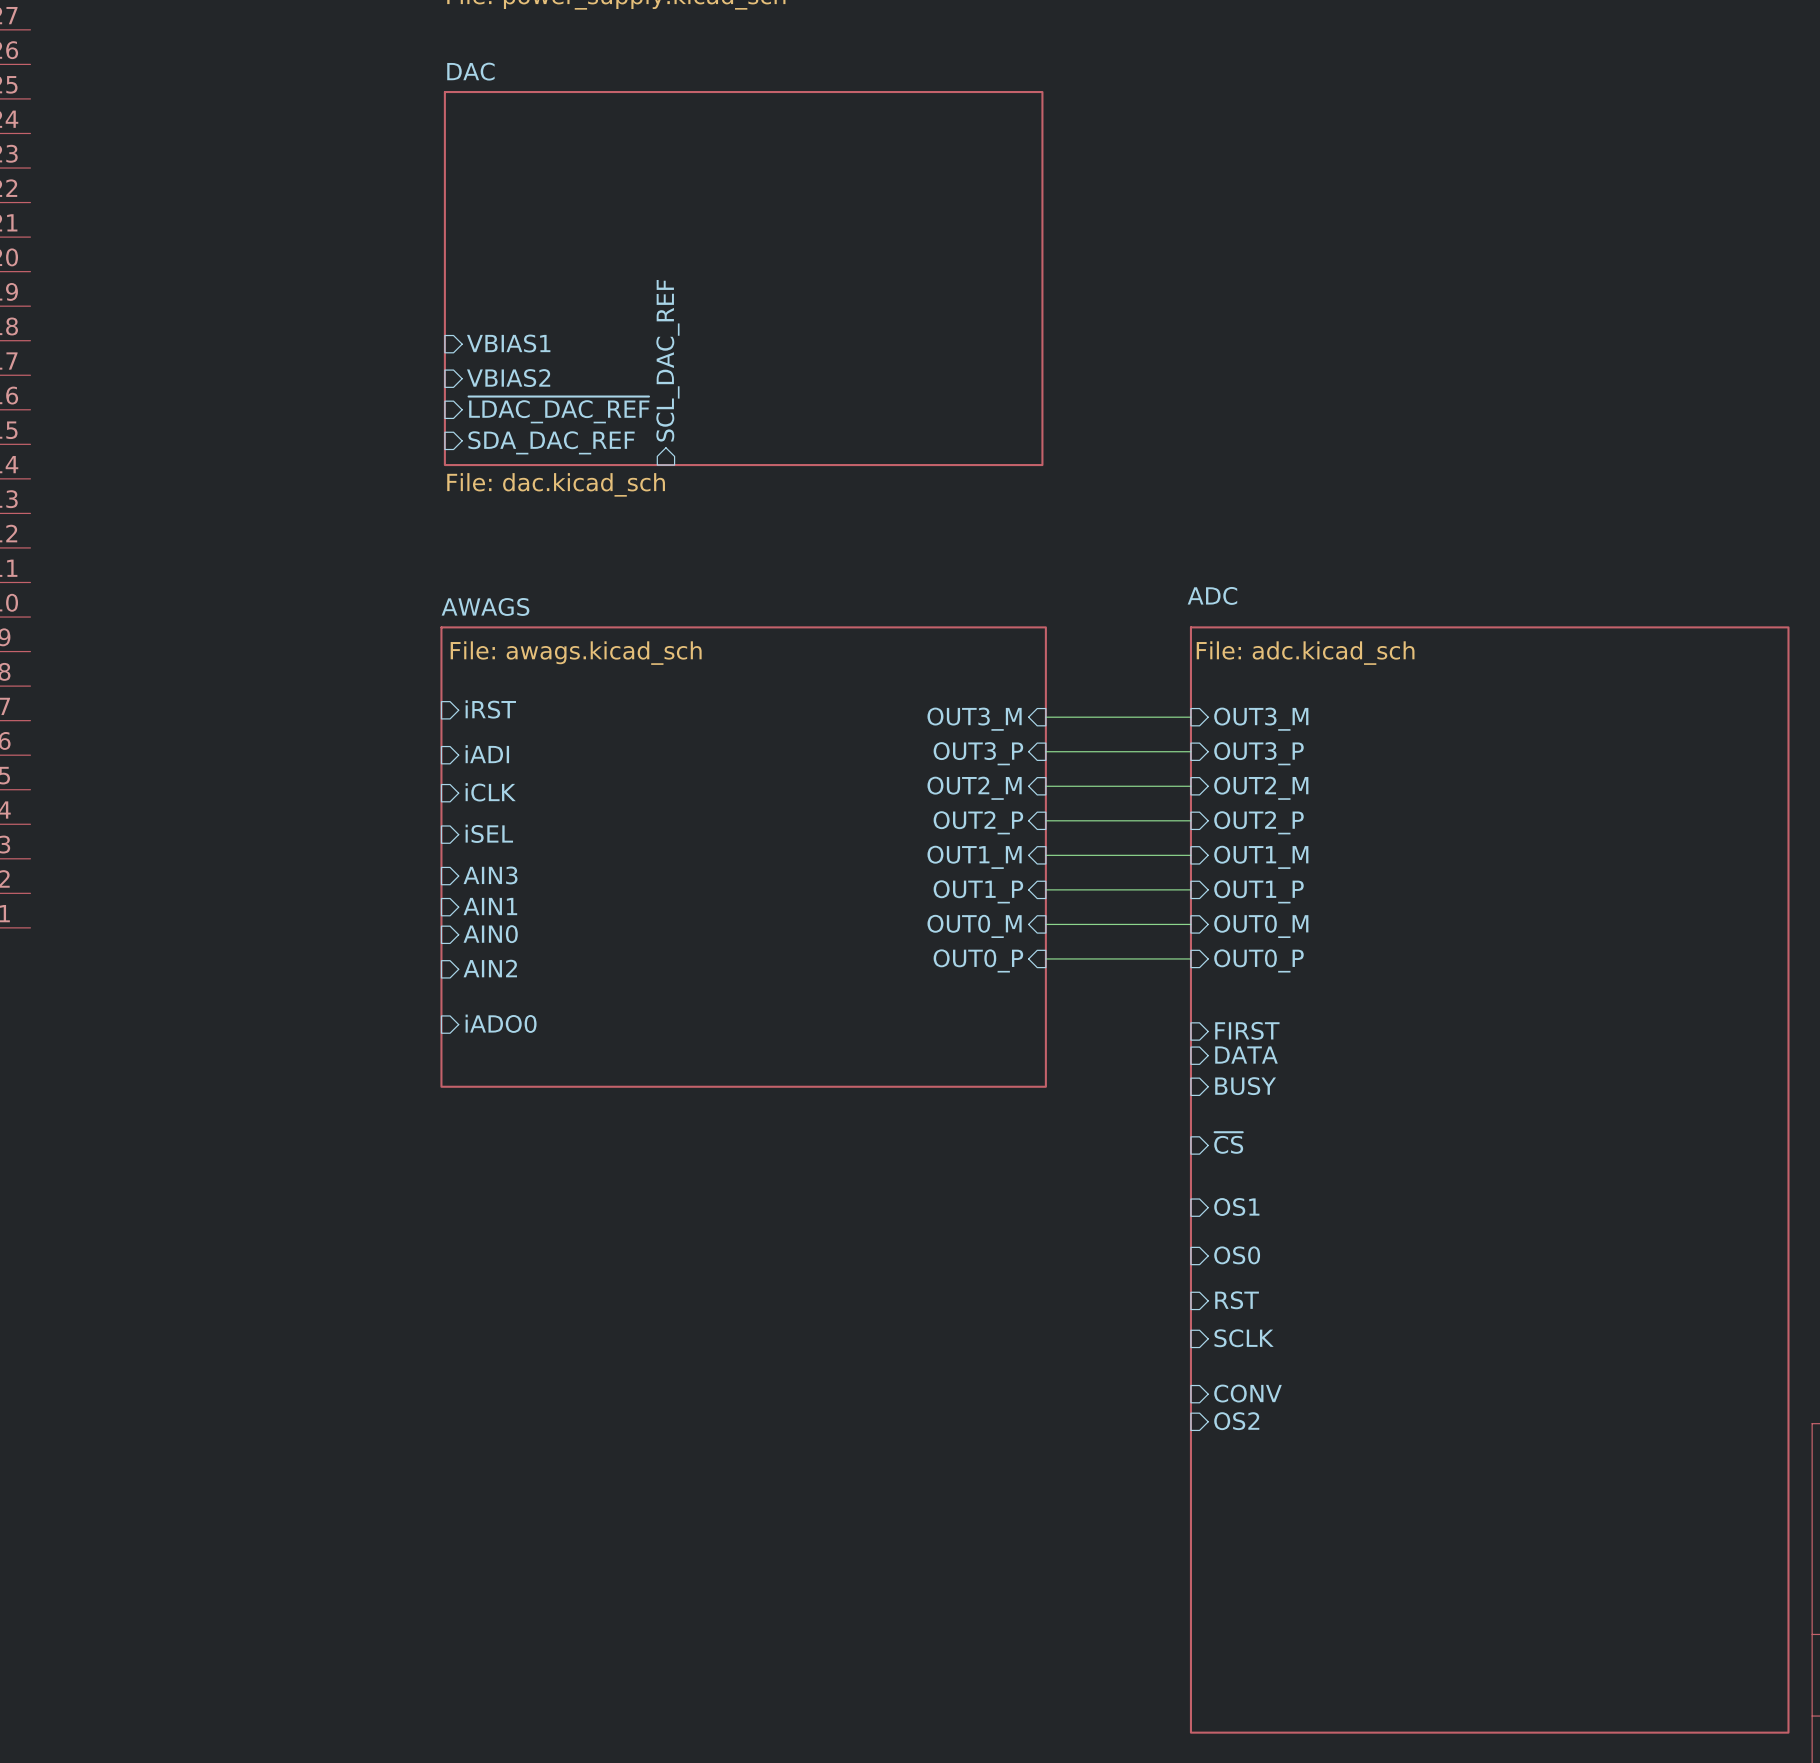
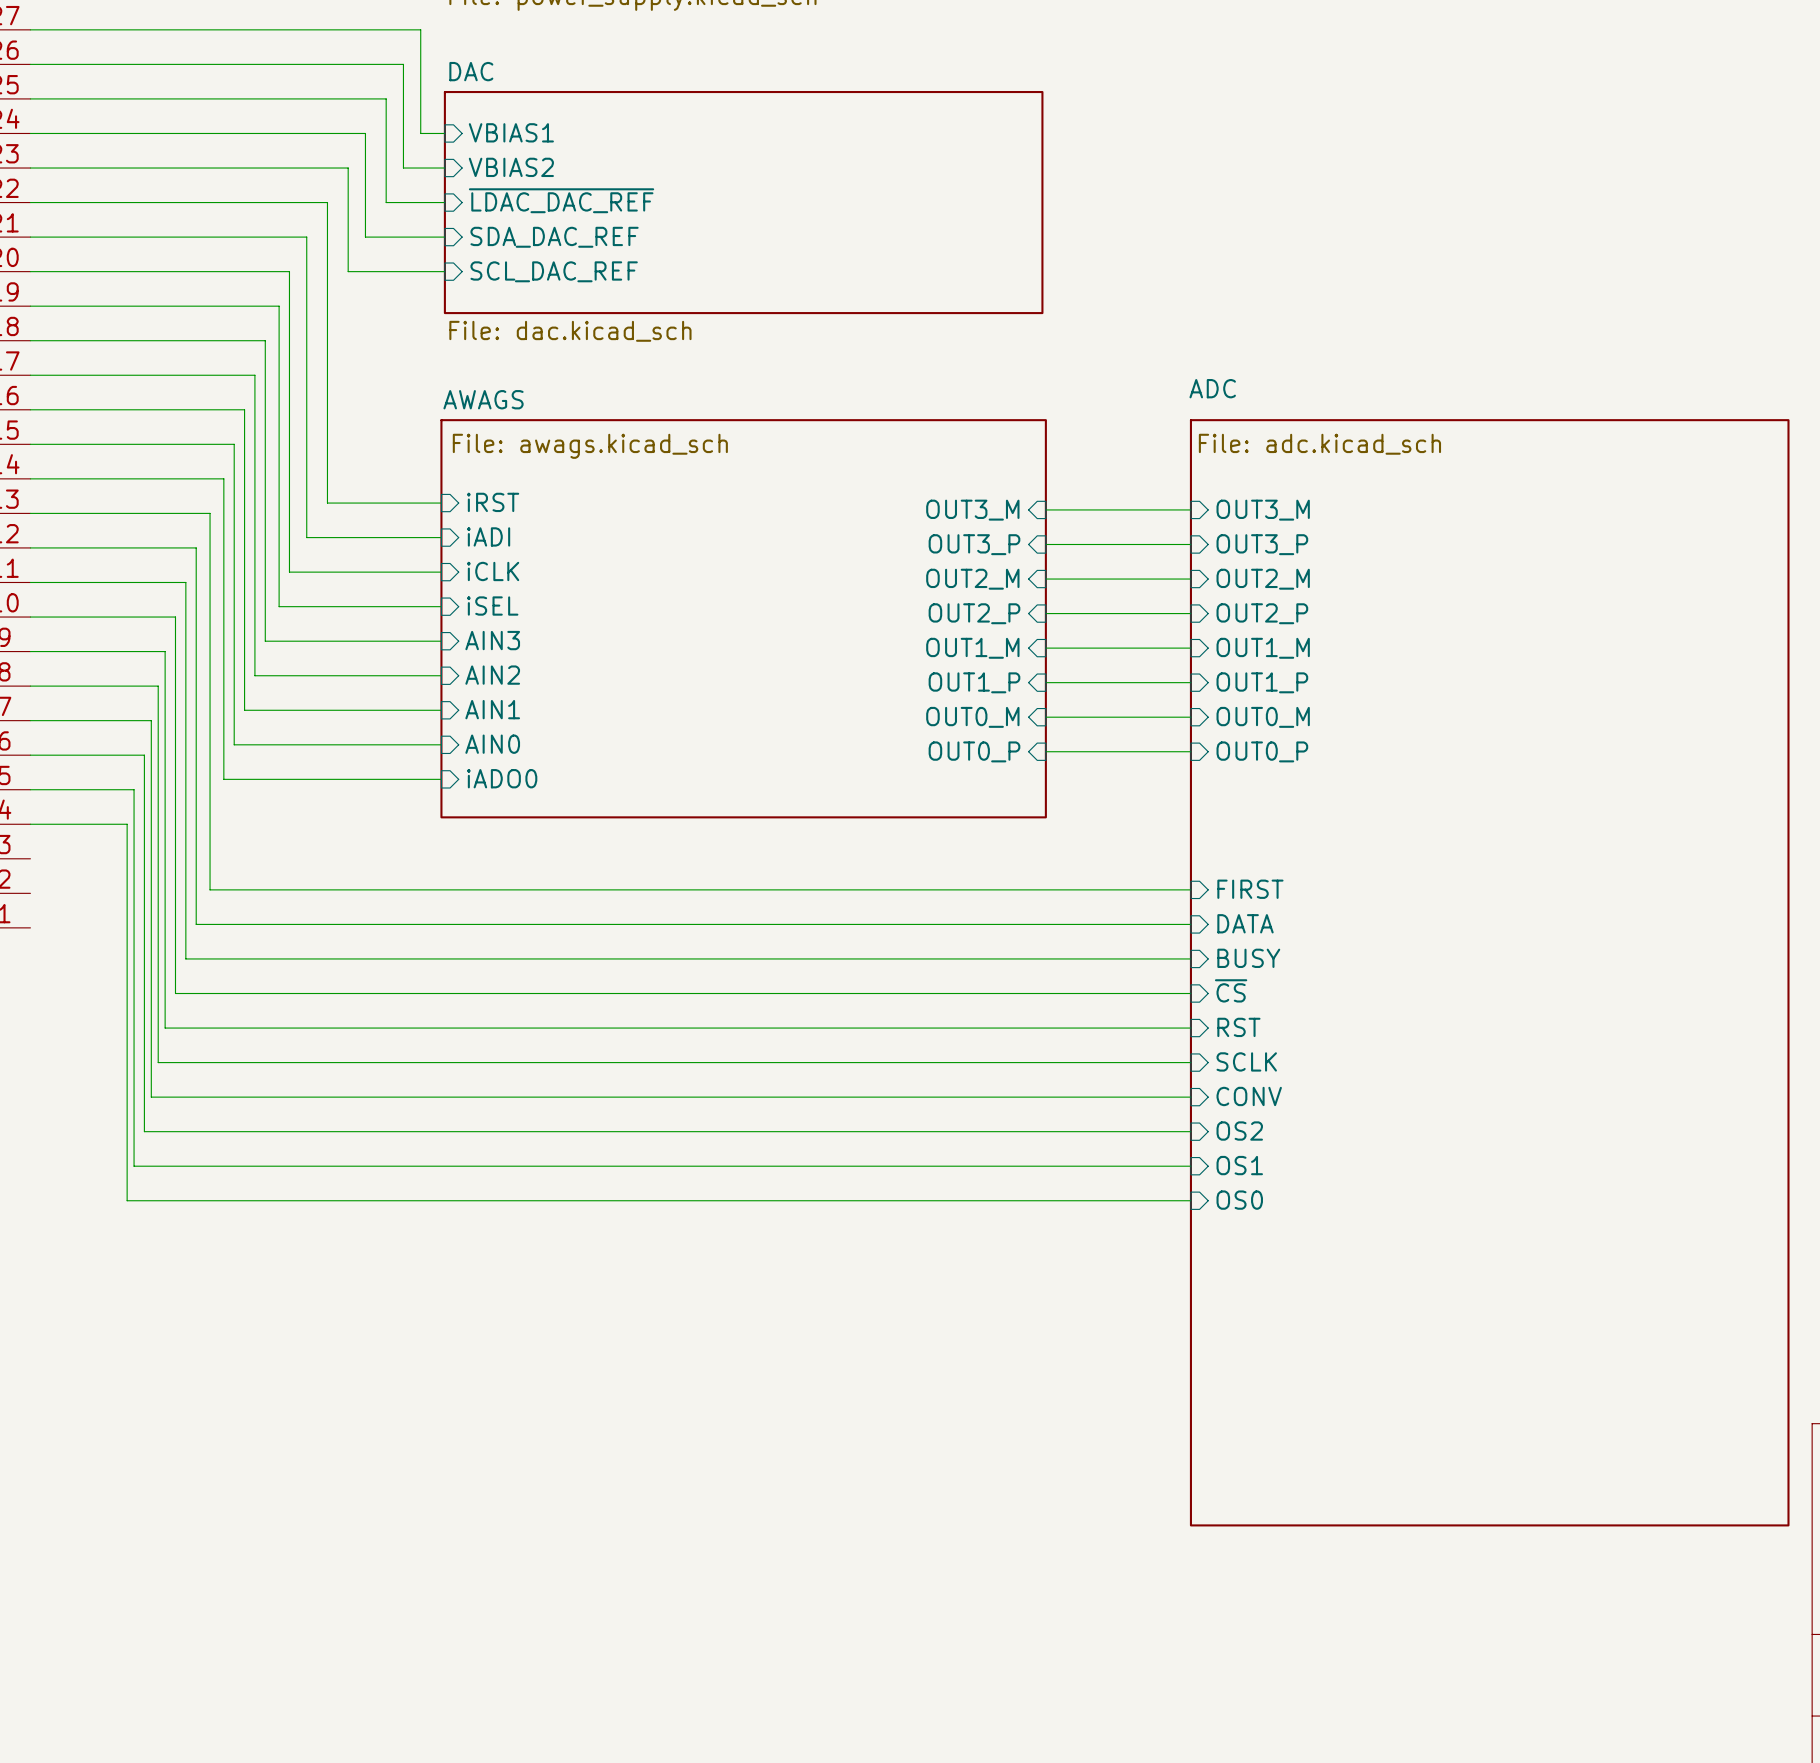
wire: none -> (30, 29) (420, 29) (420, 133) (444, 133)
wire: none -> (30, 64) (403, 64) (403, 168) (444, 168)
wire: none -> (30, 98) (386, 98) (386, 202) (444, 202)
wire: none -> (30, 133) (365, 133) (365, 237) (444, 237)
wire: none -> (30, 168) (348, 168) (348, 271) (444, 271)
wire: none -> (30, 202) (327, 202) (327, 503) (441, 503)
sheet DAC: none -> File: dac.kicad_sch (743, 202)
wire: none -> (30, 237) (306, 237) (306, 537) (441, 537)
wire: none -> (30, 271) (289, 271) (289, 572) (441, 572)
sheet DAC: File: dac.kicad_sch (743, 278) -> none
wire: none -> (30, 306) (279, 306) (279, 606) (441, 606)
wire: none -> (30, 340) (265, 340) (265, 641) (441, 641)
sheet pin position: VBIAS1 (508, 343) -> VBIAS1 (511, 132)
sheet pin rotation: 0° (667, 360) -> 90° clockwise (554, 271)
wire: none -> (30, 375) (254, 375) (254, 675) (441, 675)
sheet pin position: VBIAS2 (508, 378) -> VBIAS2 (511, 167)
wire: none -> (30, 409) (244, 409) (244, 710) (441, 710)
sheet pin position: ~{LDAC_DAC_REF} (558, 409) -> ~{LDAC_DAC_REF} (561, 200)
sheet pin position: SDA_DAC_REF (551, 442) -> SDA_DAC_REF (554, 237)
wire: none -> (30, 444) (234, 444) (234, 744) (441, 744)
wire: none -> (30, 478) (223, 478) (223, 779) (441, 779)
sheet pin: none -> iRST (493, 502)
wire: none -> (1045, 509) (1190, 509)
sheet pin: none -> OUT3_M (972, 510)
sheet pin: none -> OUT3_M (1263, 510)
wire: none -> (30, 513) (210, 513) (210, 889) (1045, 889)
wire: none -> (1045, 544) (1190, 544)
sheet pin: none -> OUT3_P (974, 544)
sheet pin: none -> OUT3_P (1262, 544)
wire: none -> (30, 547) (196, 547) (196, 924) (1045, 924)
wire: none -> (1045, 579) (1190, 579)
sheet pin: none -> OUT2_M (972, 579)
sheet pin: none -> OUT2_M (1263, 579)
wire: none -> (30, 582) (185, 582) (185, 958) (1045, 958)
sheet pin: none -> OUT2_P (974, 613)
sheet pin: none -> OUT2_P (1262, 613)
wire: none -> (30, 617) (175, 617) (175, 993) (1190, 993)
sheet AWAGS: none -> File: awags.kicad_sch (743, 618)
sheet pin: none -> OUT1_M (972, 648)
sheet pin: none -> OUT1_M (1263, 648)
wire: none -> (30, 651) (165, 651) (165, 1028) (1190, 1028)
sheet pin: none -> OUT1_P (974, 682)
sheet pin: none -> OUT1_P (1262, 682)
wire: none -> (30, 686) (158, 686) (158, 1062) (1190, 1062)
sheet pin: iRST (490, 709) -> AIN1 (492, 709)
sheet pin: OUT3_M (974, 719) -> OUT0_M (972, 717)
sheet pin: OUT3_M (1261, 719) -> OUT0_M (1263, 717)
wire: none -> (30, 720) (151, 720) (151, 1097) (1190, 1097)
sheet pin: OUT3_P (978, 753) -> OUT0_P (974, 751)
sheet pin: OUT3_P (1258, 753) -> OUT0_P (1262, 751)
sheet pin position: iADI (487, 754) -> iADI (488, 536)
wire: none -> (30, 755) (144, 755) (144, 1131) (1190, 1131)
wire: (1045, 786) (1190, 786) -> (1045, 613) (1190, 613)
sheet pin: OUT2_M (974, 788) -> none
sheet pin: OUT2_M (1261, 788) -> none
wire: none -> (30, 789) (134, 789) (134, 1166) (1190, 1166)
sheet pin position: iCLK (490, 792) -> iCLK (493, 571)
wire: (1045, 820) (1190, 820) -> (1045, 648) (1190, 648)
sheet pin: OUT2_P (978, 822) -> none
sheet pin: OUT2_P (1258, 822) -> none
wire: none -> (30, 824) (127, 824) (127, 1200) (1190, 1200)
sheet pin position: iSEL (489, 833) -> iSEL (492, 606)
wire: (1045, 855) (1190, 855) -> (1045, 682) (1190, 682)
sheet AWAGS: File: awags.kicad_sch (743, 857) -> none
sheet pin: OUT1_M (974, 857) -> none
sheet pin: OUT1_M (1261, 857) -> none
sheet pin position: AIN3 (490, 875) -> AIN3 (492, 640)
sheet pin: OUT1_P (978, 891) -> none
sheet pin: OUT1_P (1258, 891) -> FIRST (1250, 889)
sheet pin: AIN1 (490, 906) -> none
sheet pin: OUT0_M (974, 926) -> none
sheet pin: OUT0_M (1261, 926) -> DATA (1245, 923)
sheet pin position: AIN0 (490, 934) -> AIN0 (492, 744)
sheet pin: OUT0_P (978, 960) -> none
sheet pin: OUT0_P (1258, 960) -> BUSY (1248, 958)
sheet pin position: AIN2 (490, 968) -> AIN2 (492, 675)
sheet pin position: iADO0 (501, 1023) -> iADO0 (502, 778)
sheet pin: FIRST (1247, 1030) -> none
sheet pin: DATA (1246, 1055) -> none
sheet pin: BUSY (1245, 1086) -> none
sheet pin position: ~{CS} (1228, 1143) -> ~{CS} (1231, 990)
sheet ADC position: (1489, 1180) -> (1489, 972)
sheet pin position: OS1 (1236, 1207) -> OS1 (1239, 1165)
sheet pin position: OS0 (1237, 1255) -> OS0 (1239, 1200)
sheet pin position: RST (1237, 1300) -> RST (1238, 1027)
sheet pin position: SCLK (1244, 1338) -> SCLK (1246, 1061)
sheet pin position: CONV (1248, 1393) -> CONV (1249, 1096)
sheet pin position: OS2 (1236, 1421) -> OS2 (1239, 1131)

